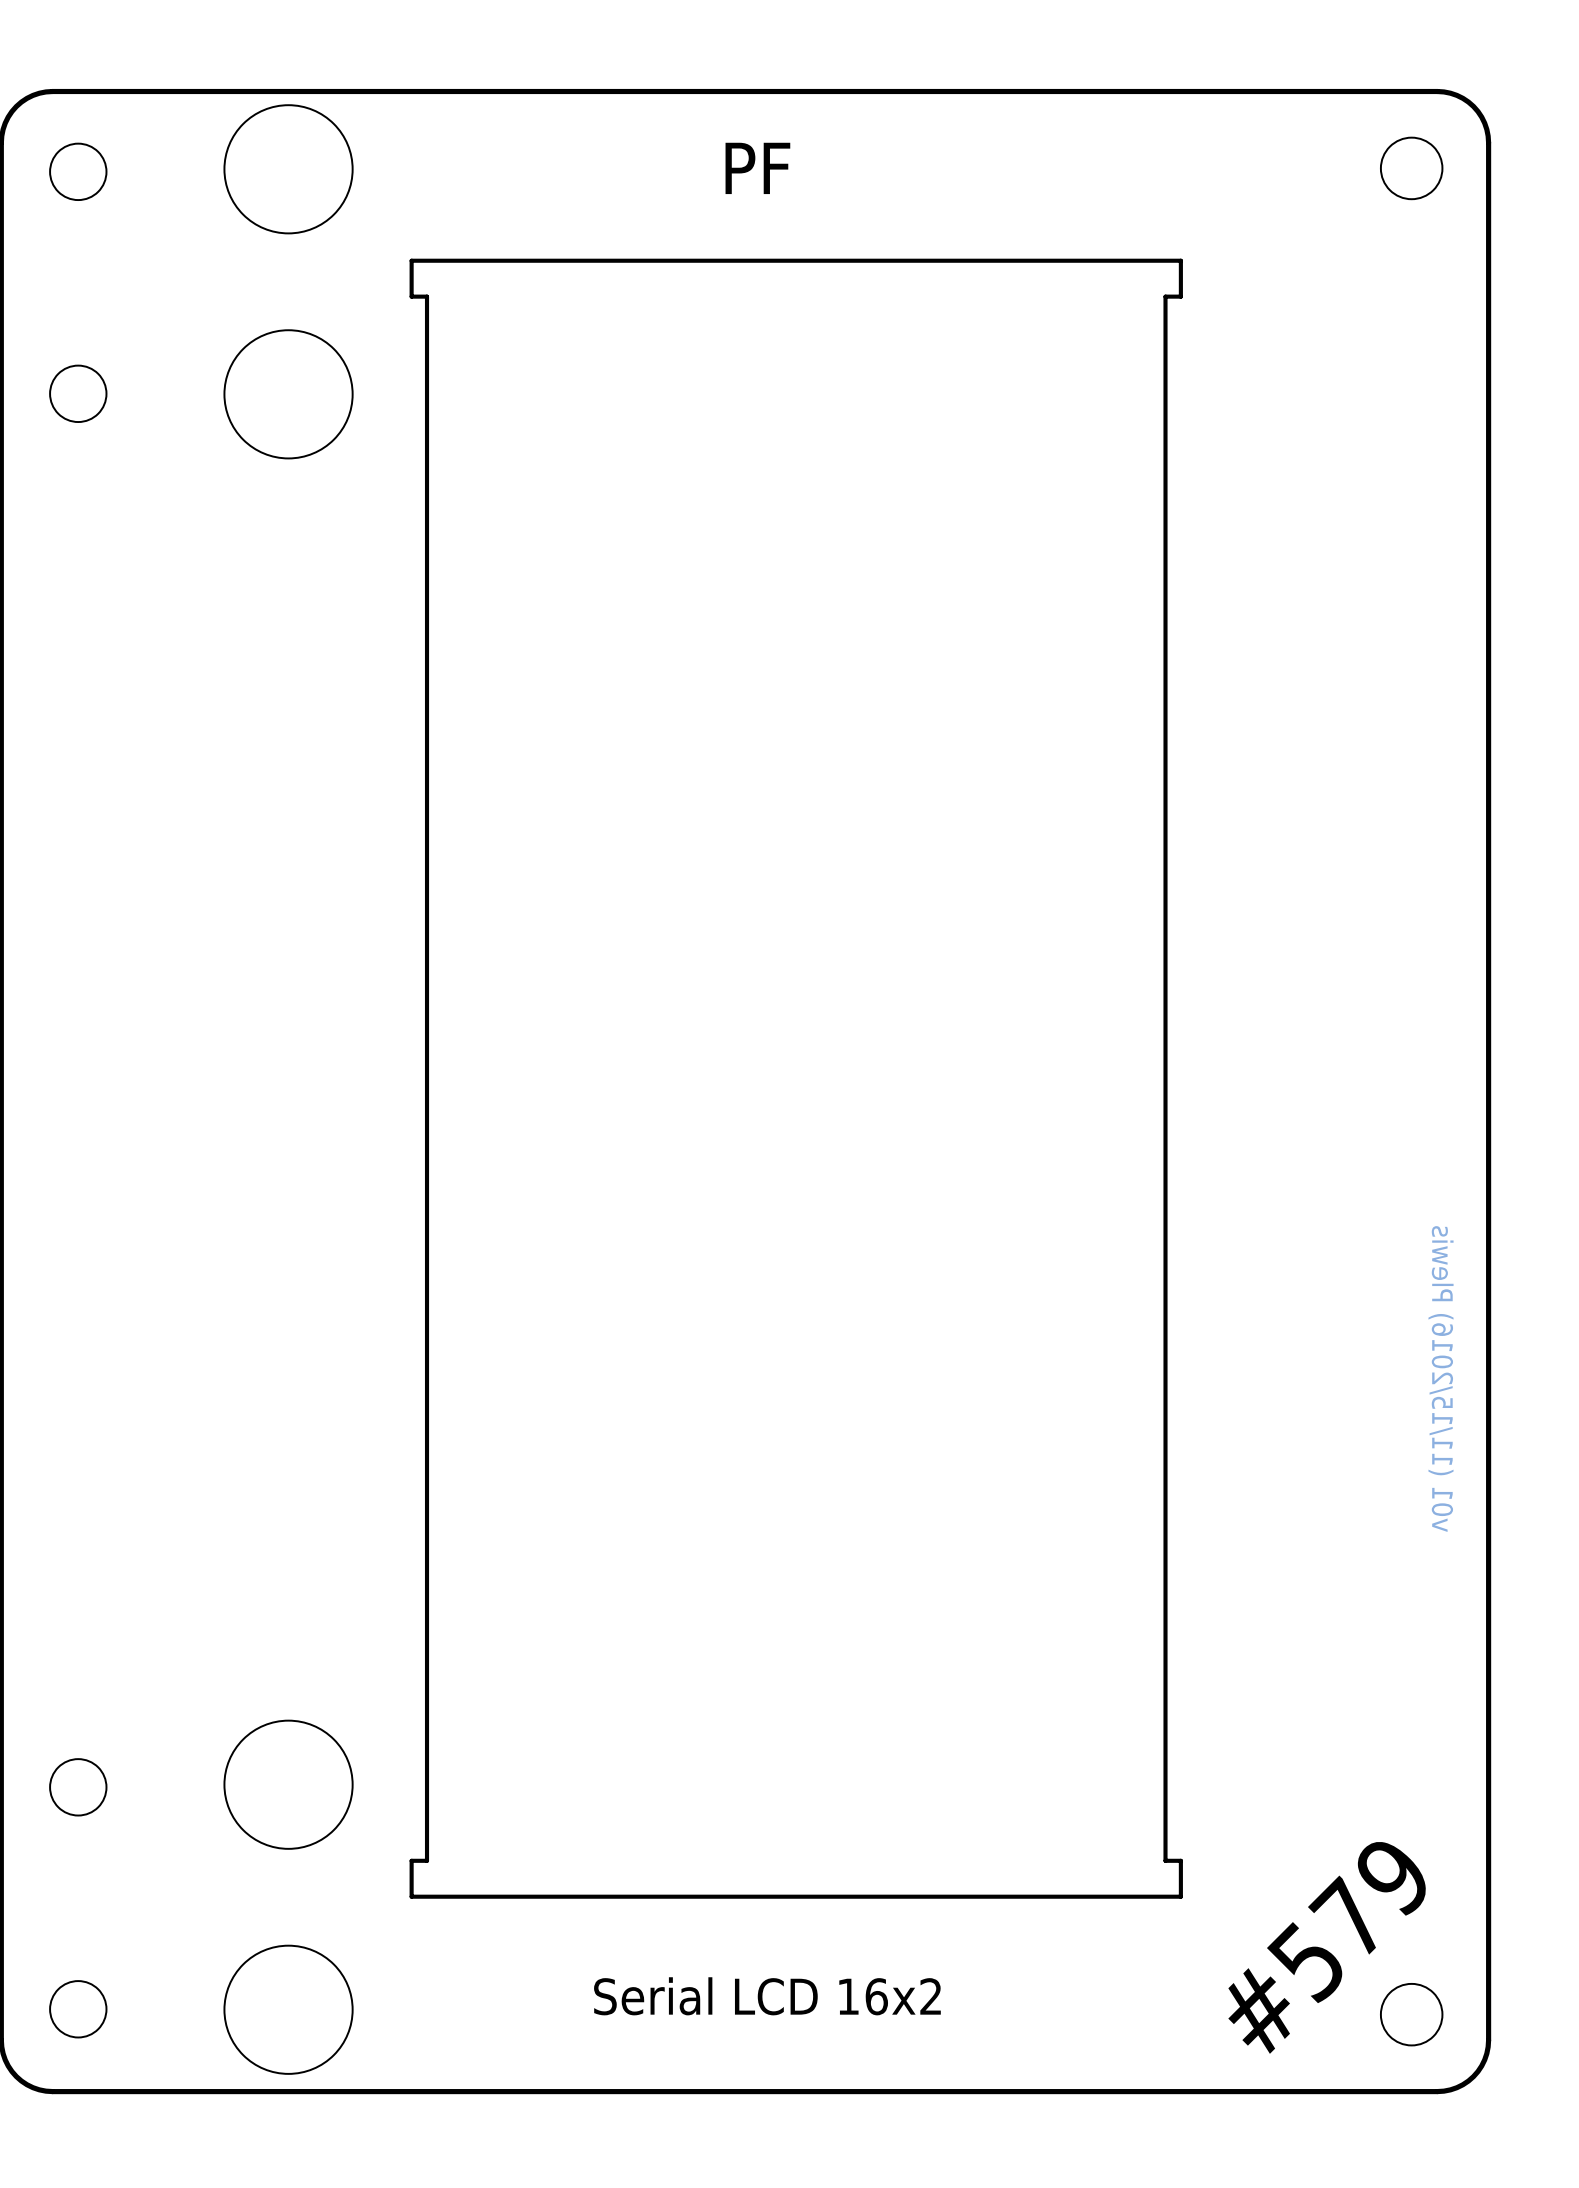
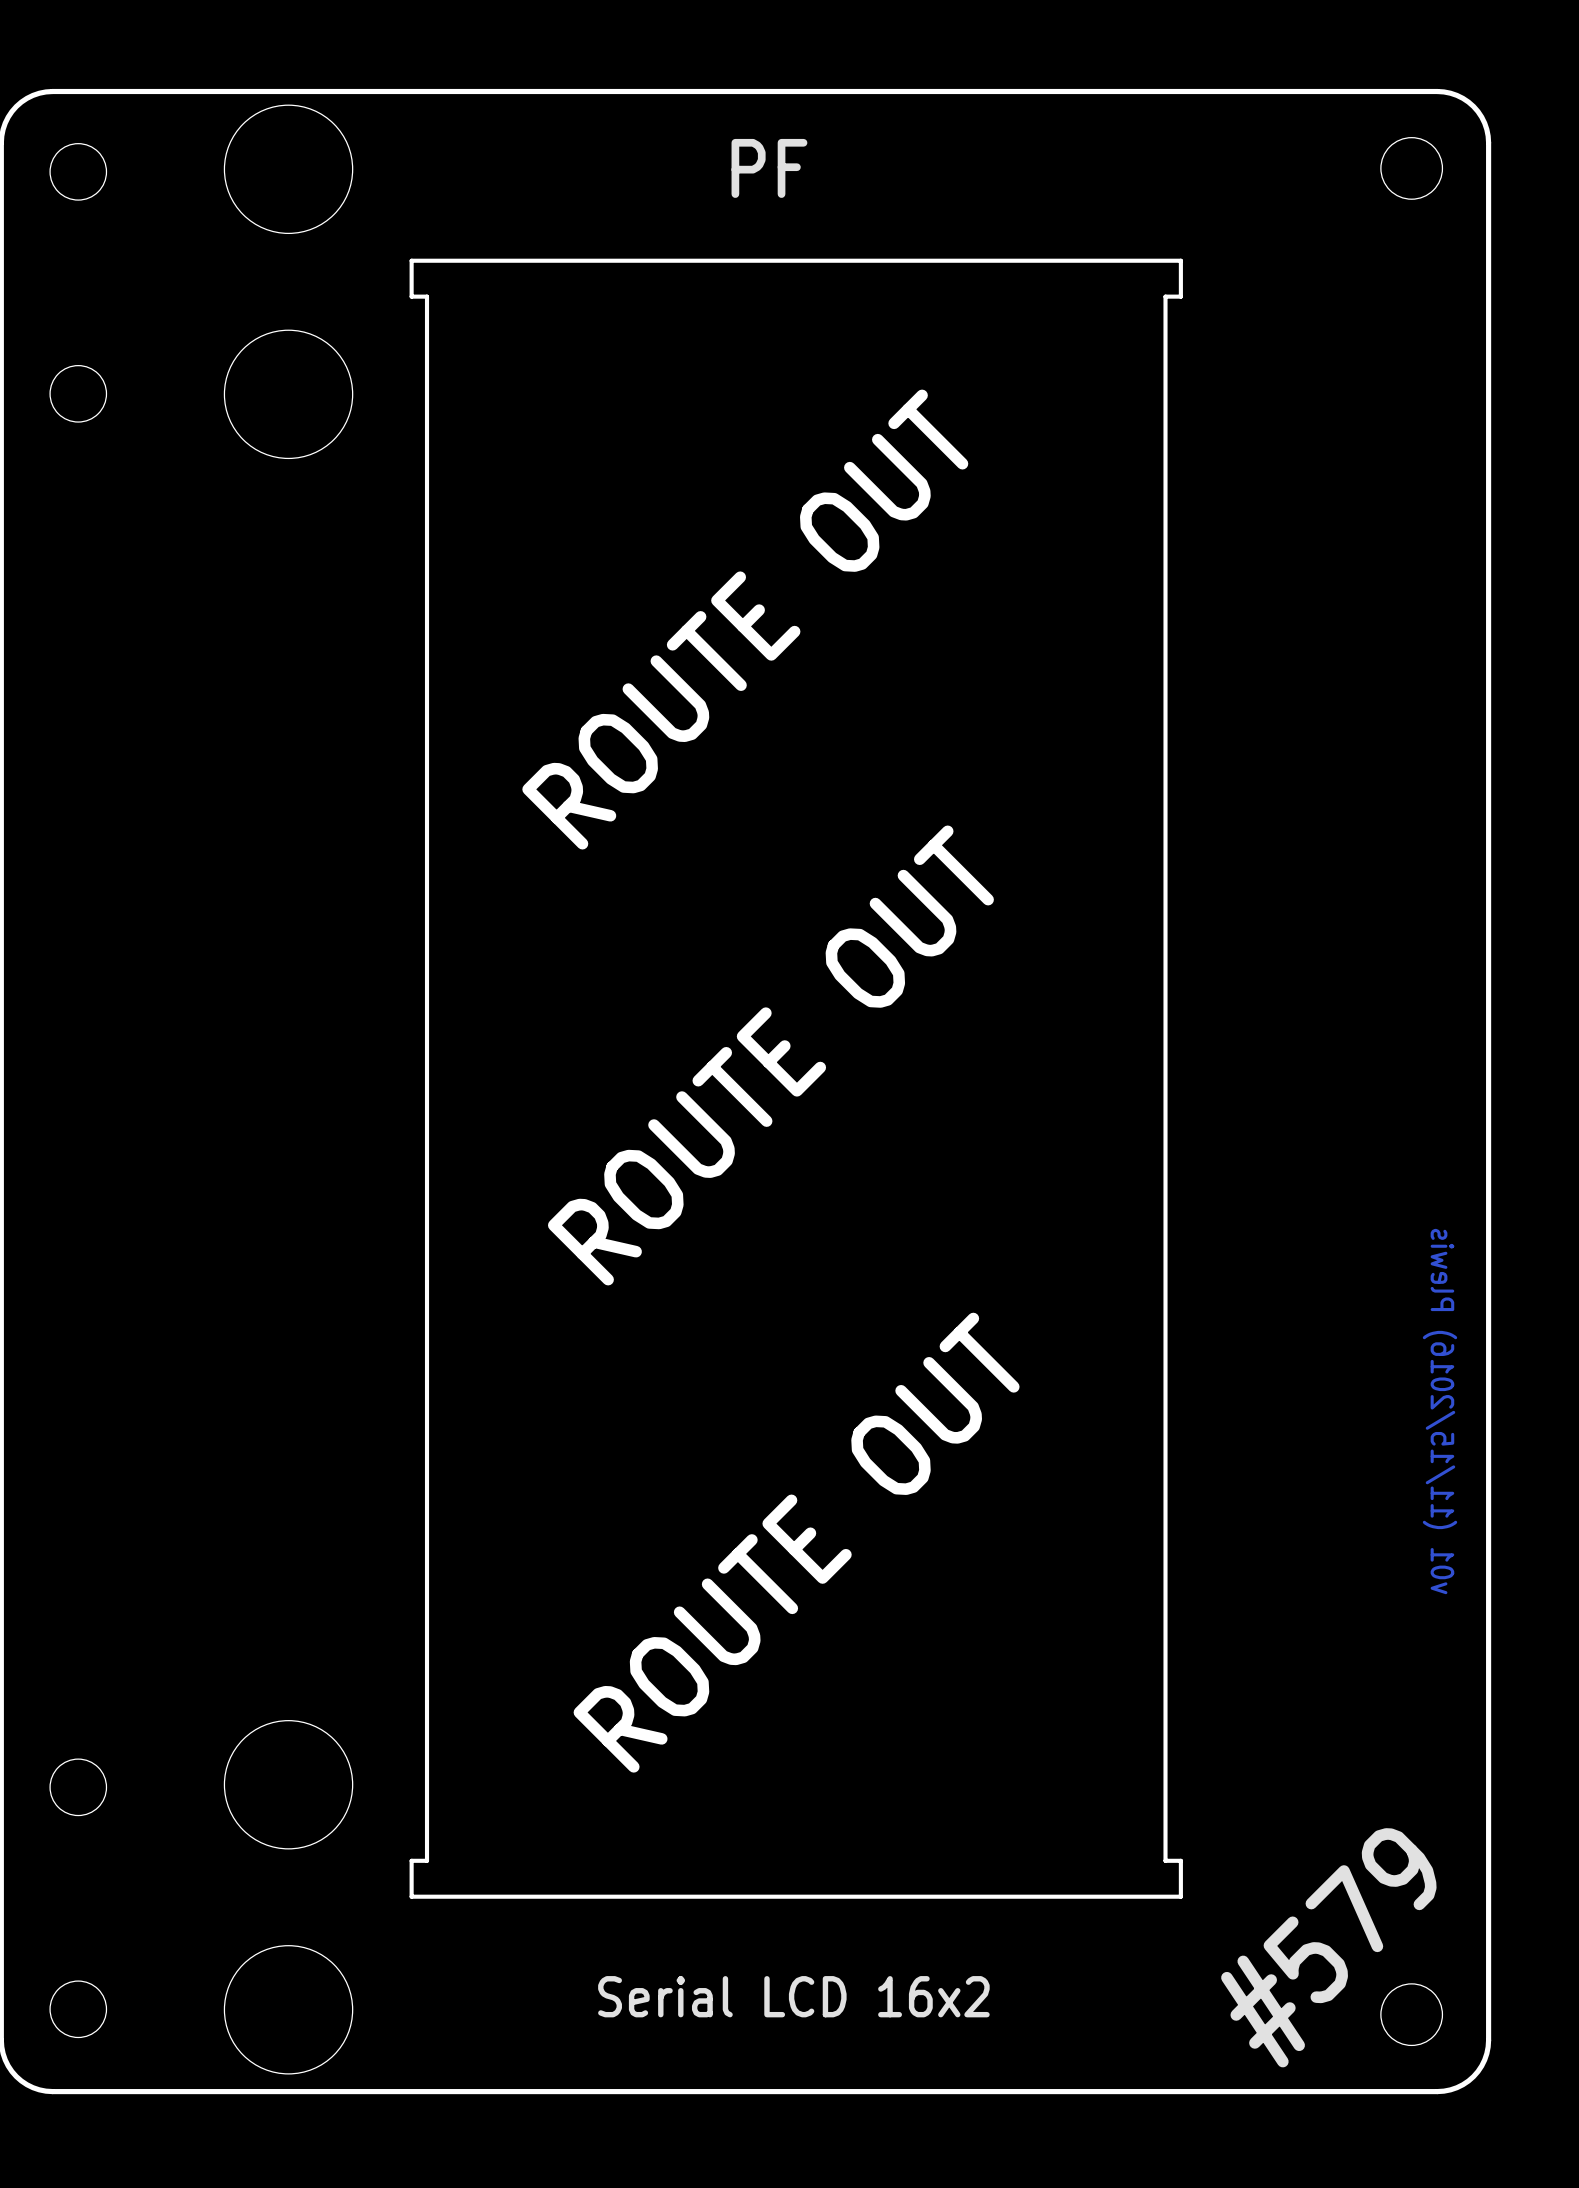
text: none -> ROUTE OUT (745, 619)
text: none -> ROUTE OUT (770, 1055)
text: none -> ROUTE OUT (796, 1542)

